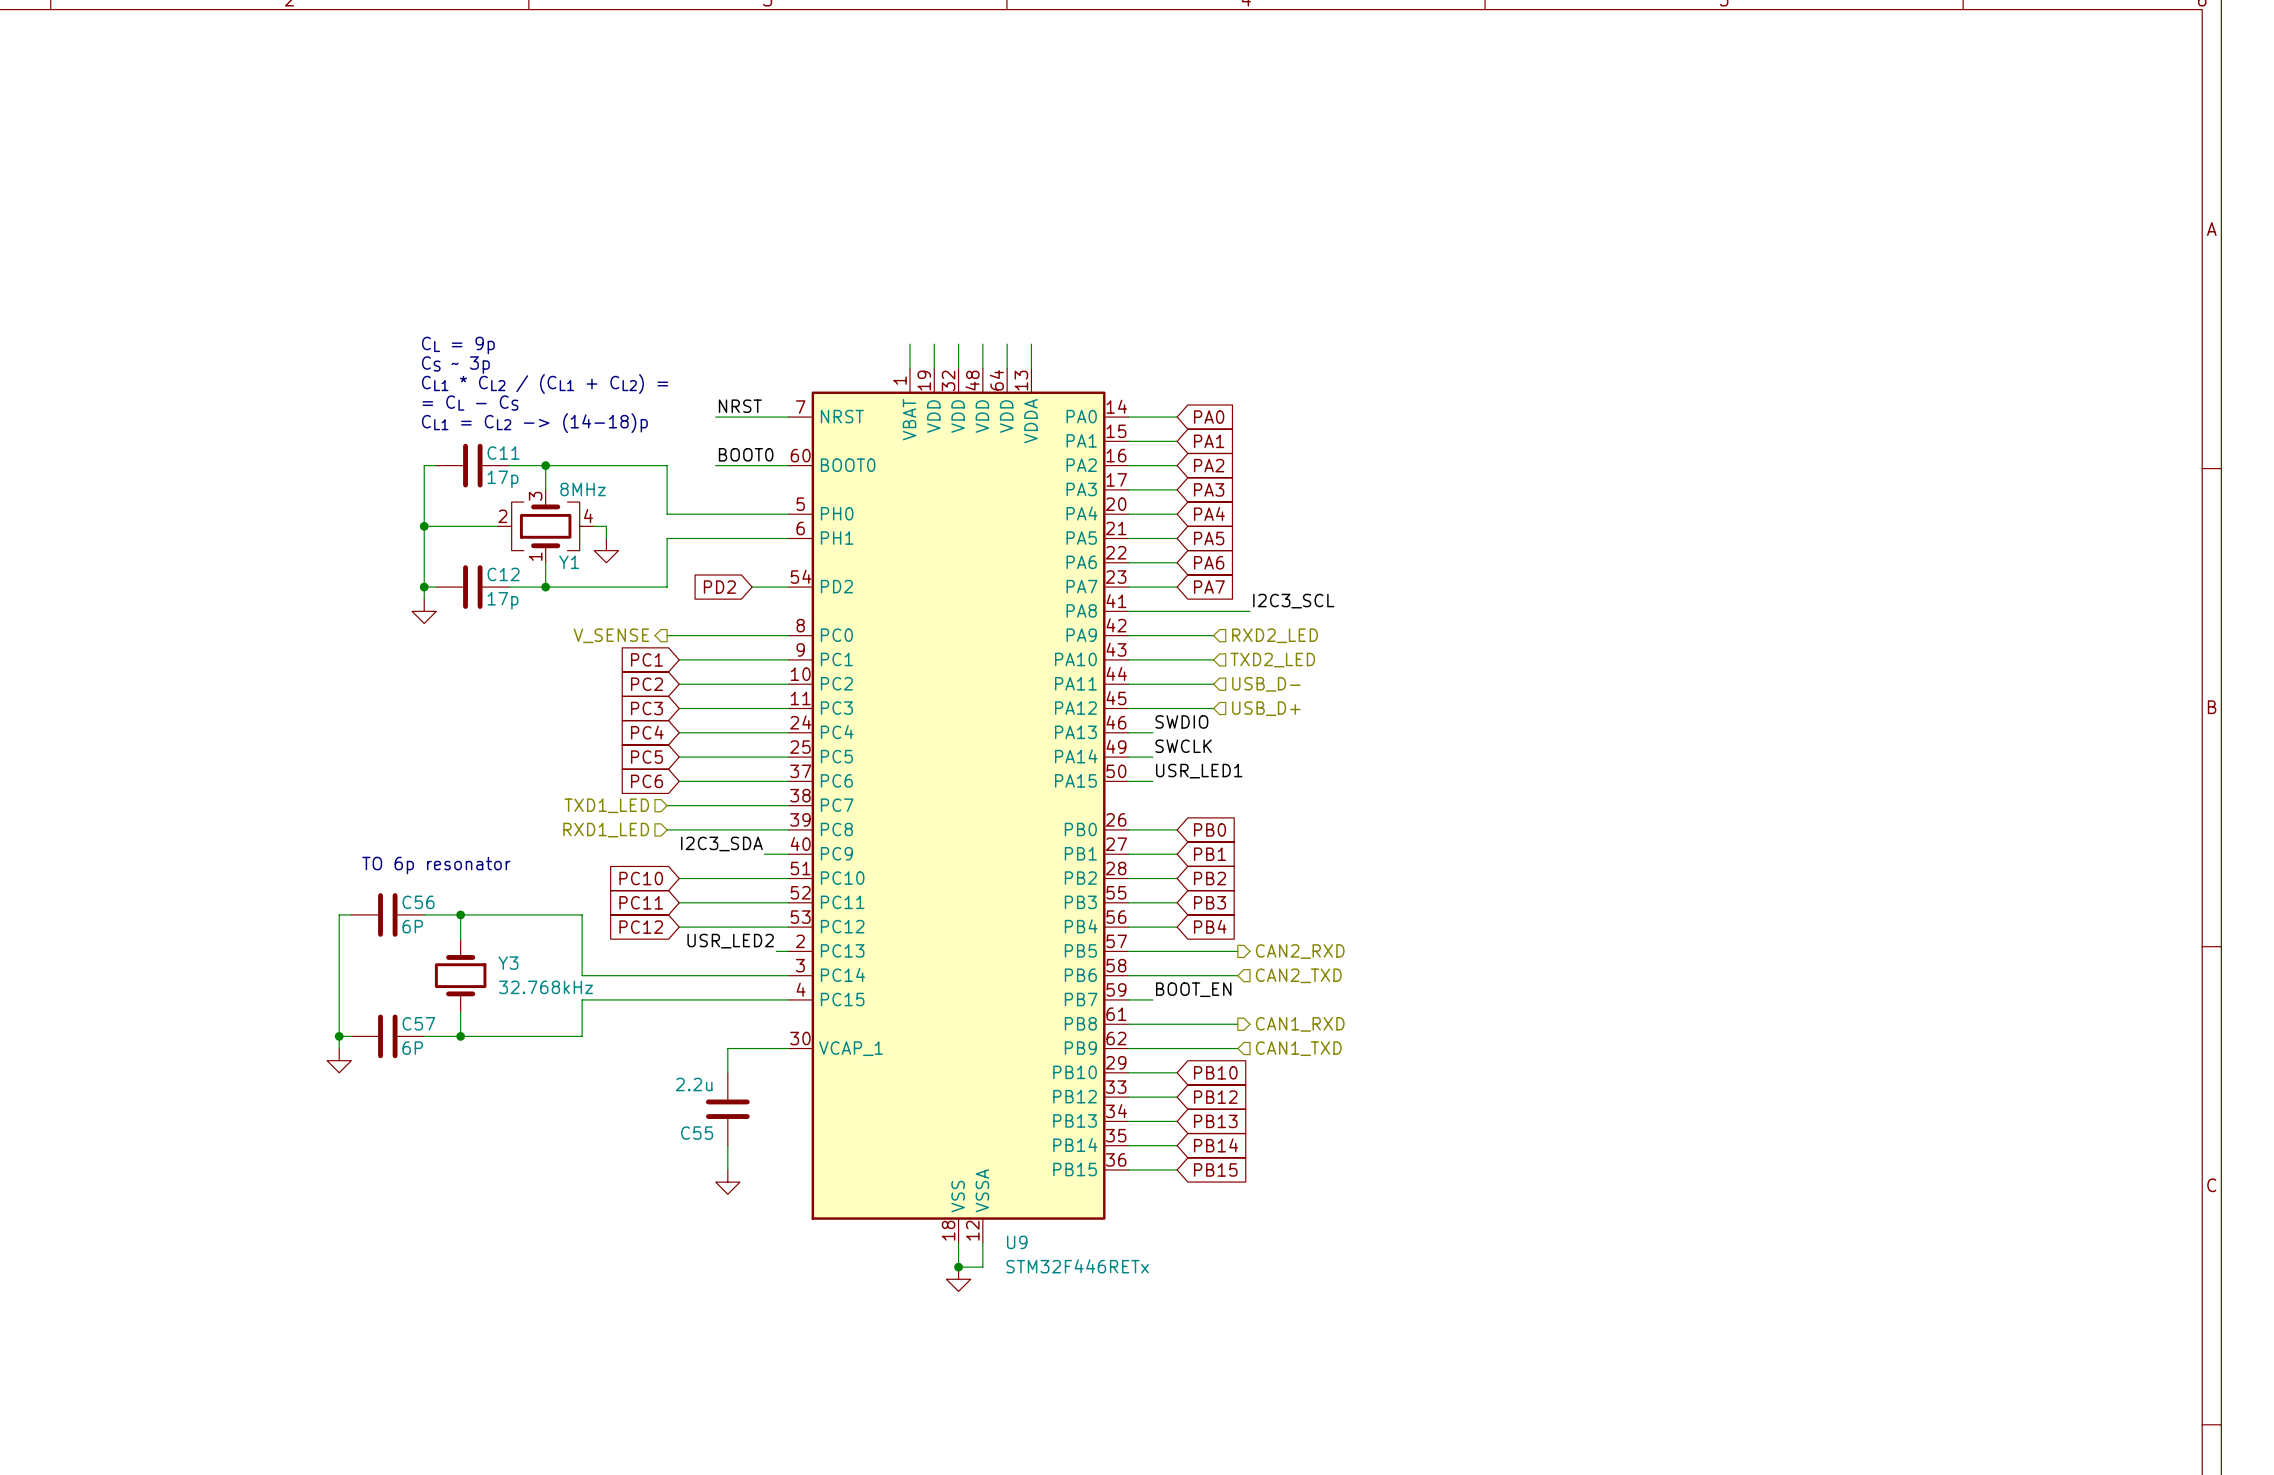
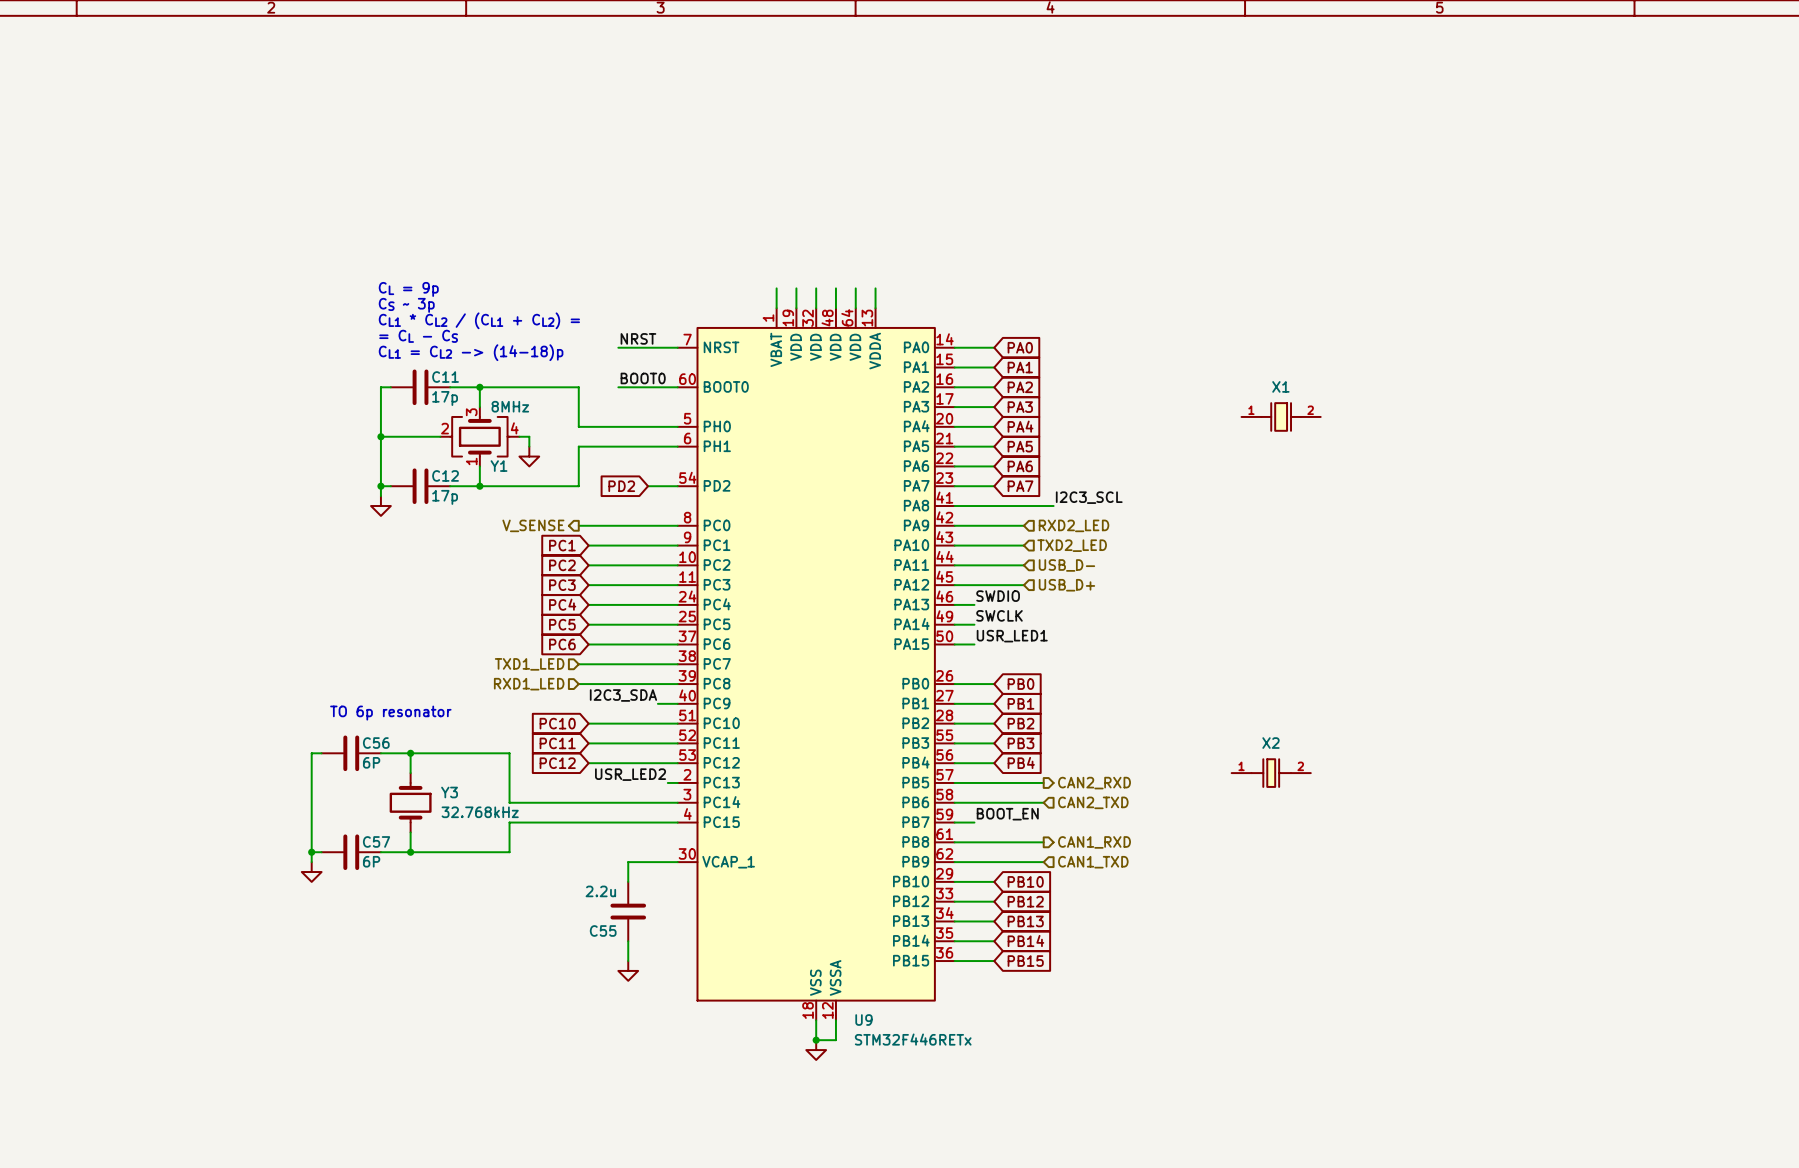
X1: none -> (1281, 416)
X2: none -> (1271, 773)

